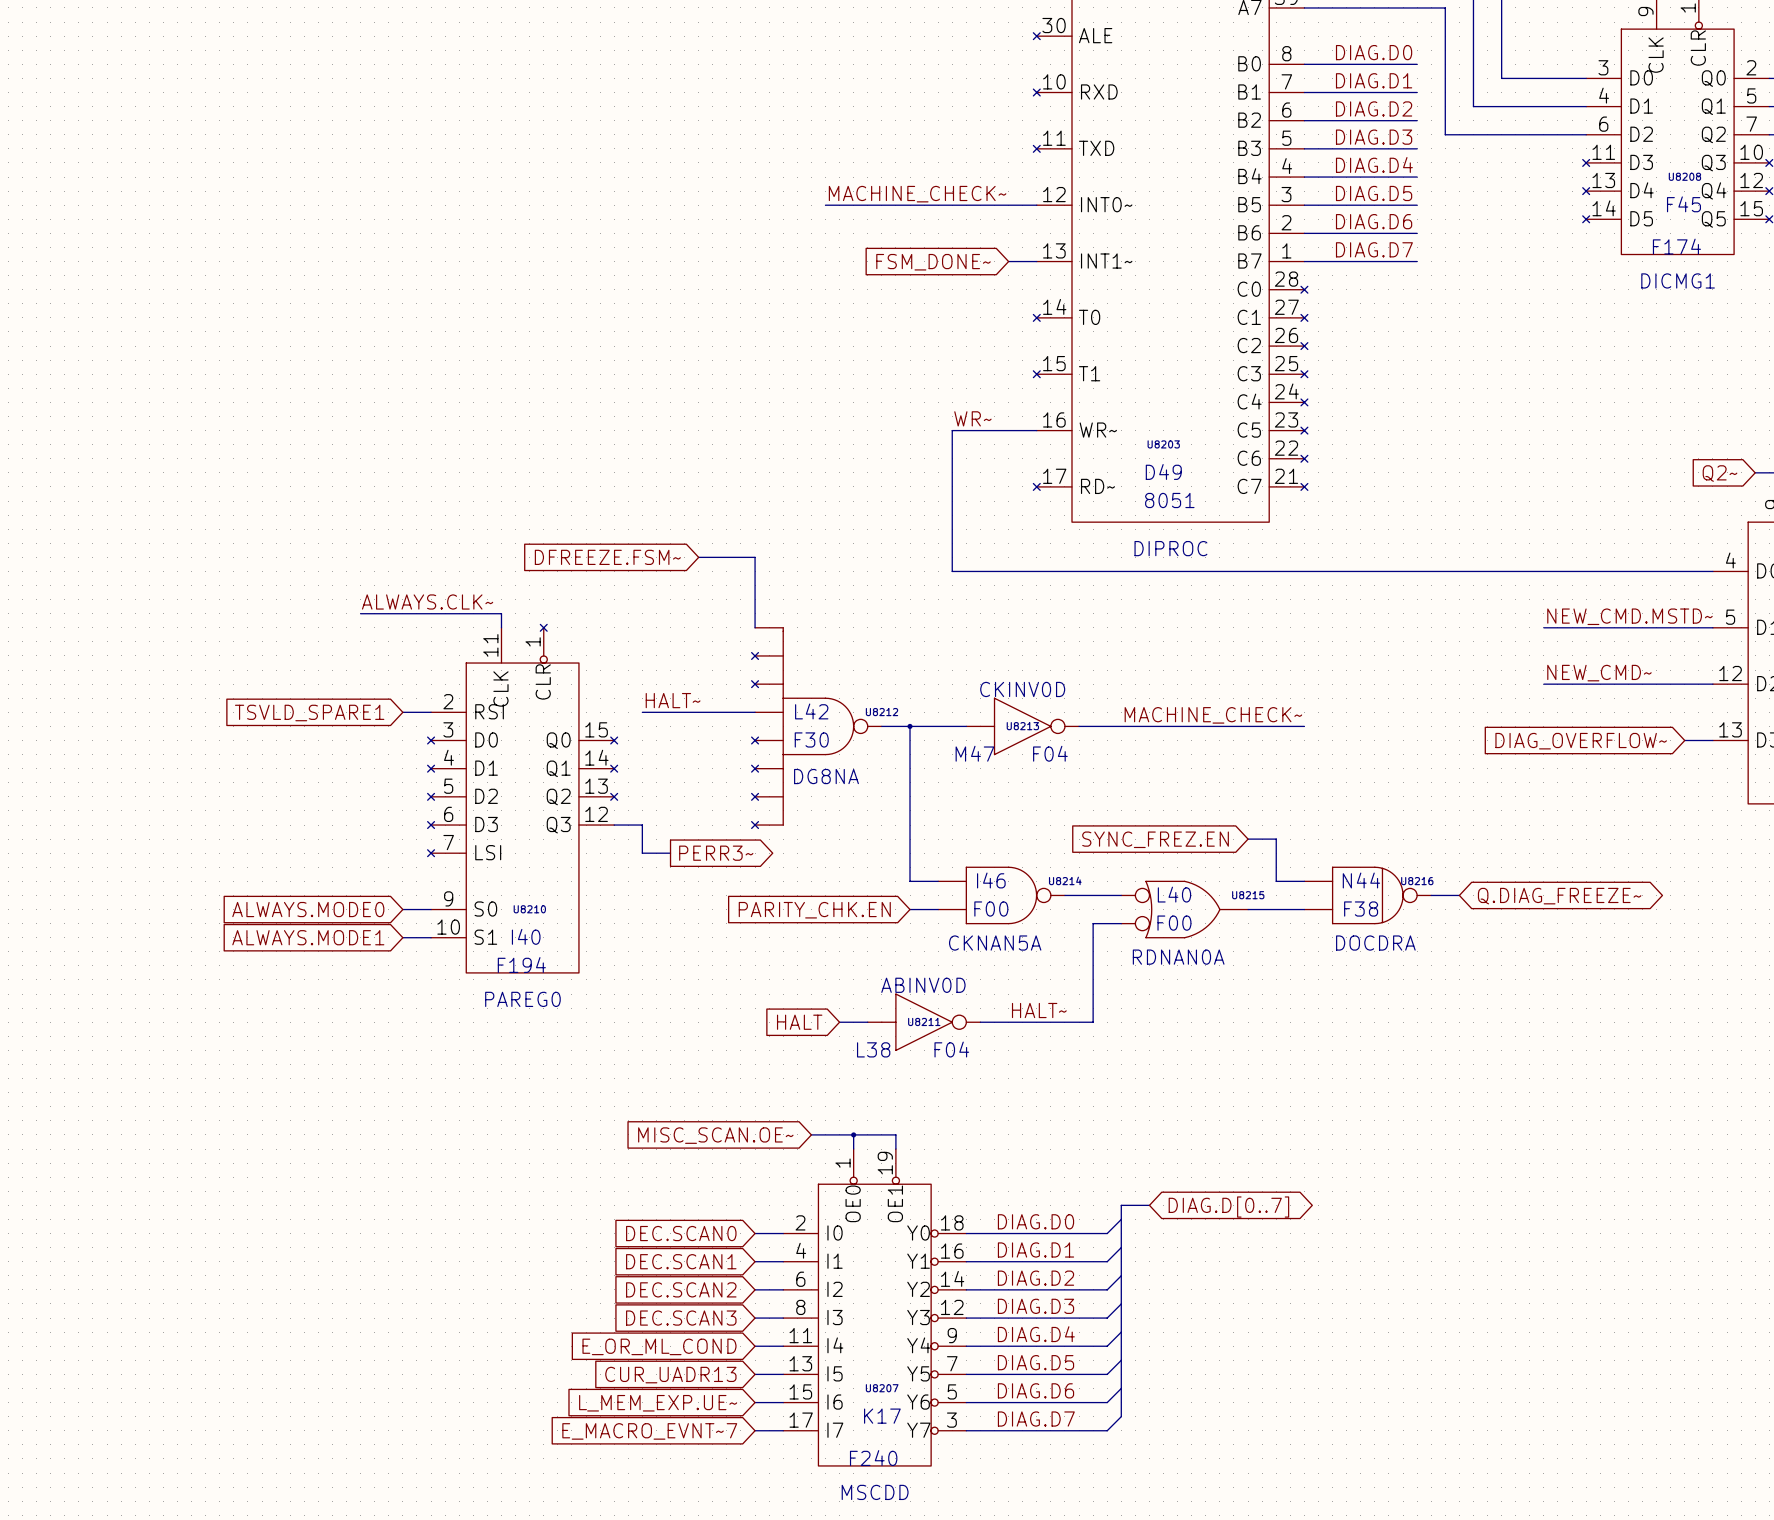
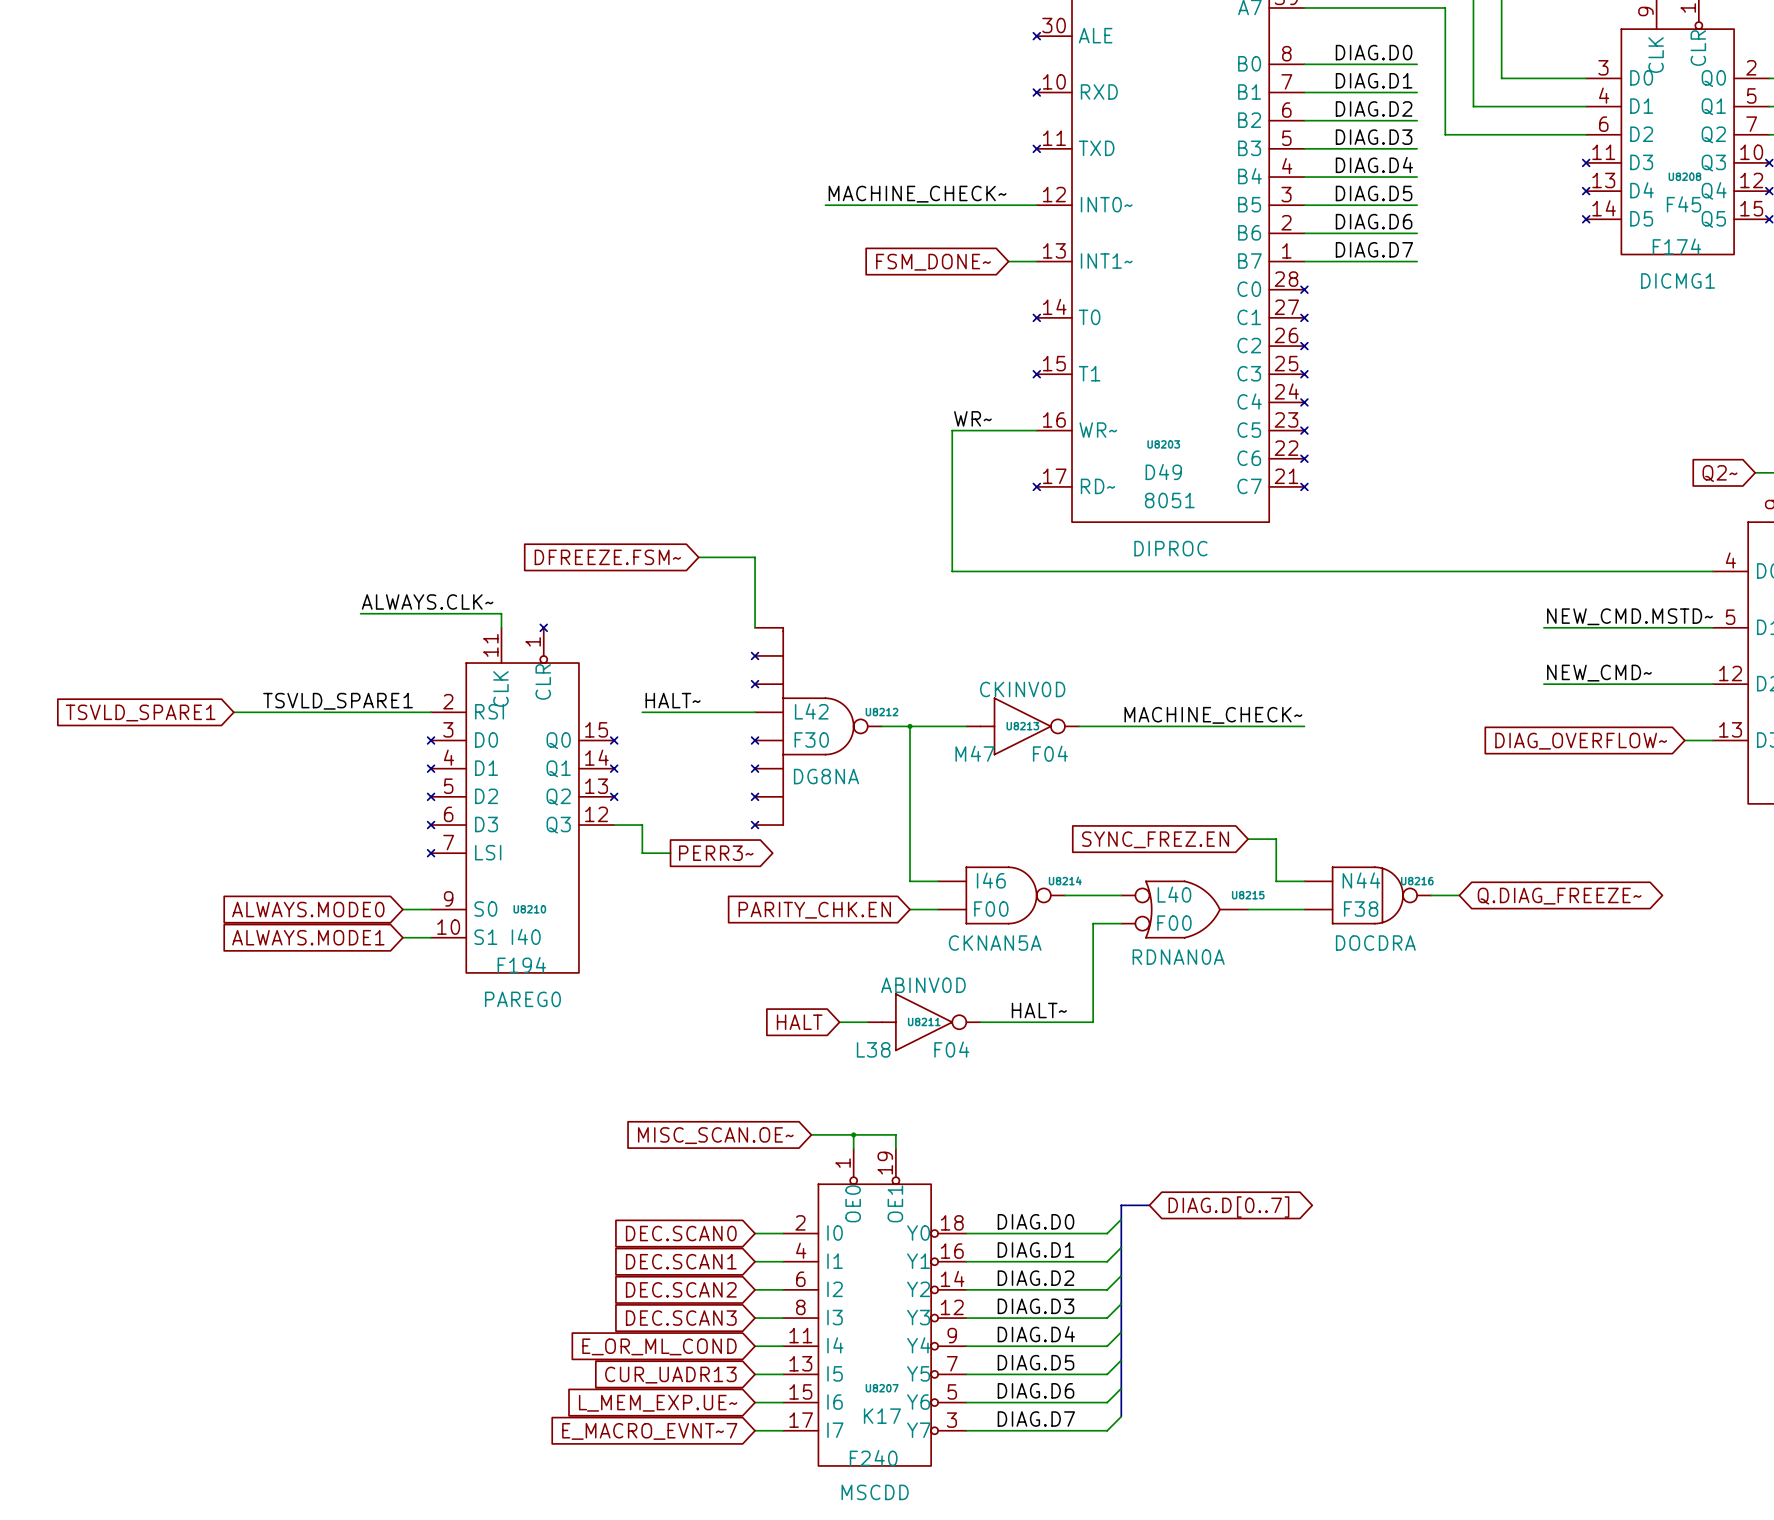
label: none -> TSVLD_SPARE1 (338, 701)
global label: none -> TSVLD_SPARE1 (140, 712)
wire: none -> (233, 712) (402, 712)
global label: TSVLD_SPARE1 (309, 712) -> none

